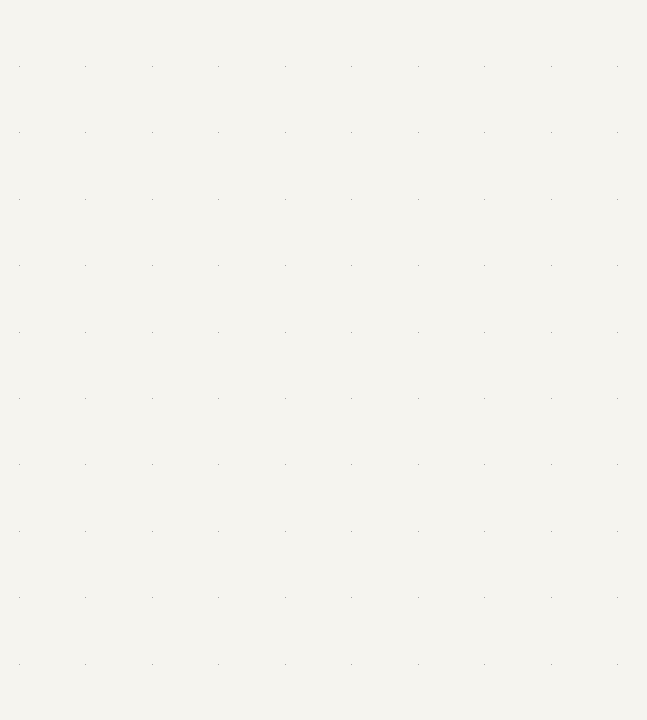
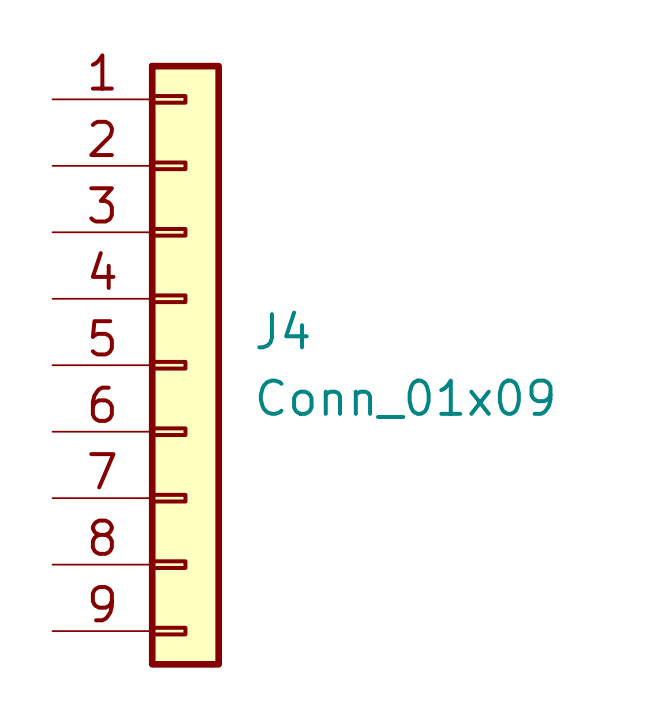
J4: none -> Conn_01x09 (137, 365)

